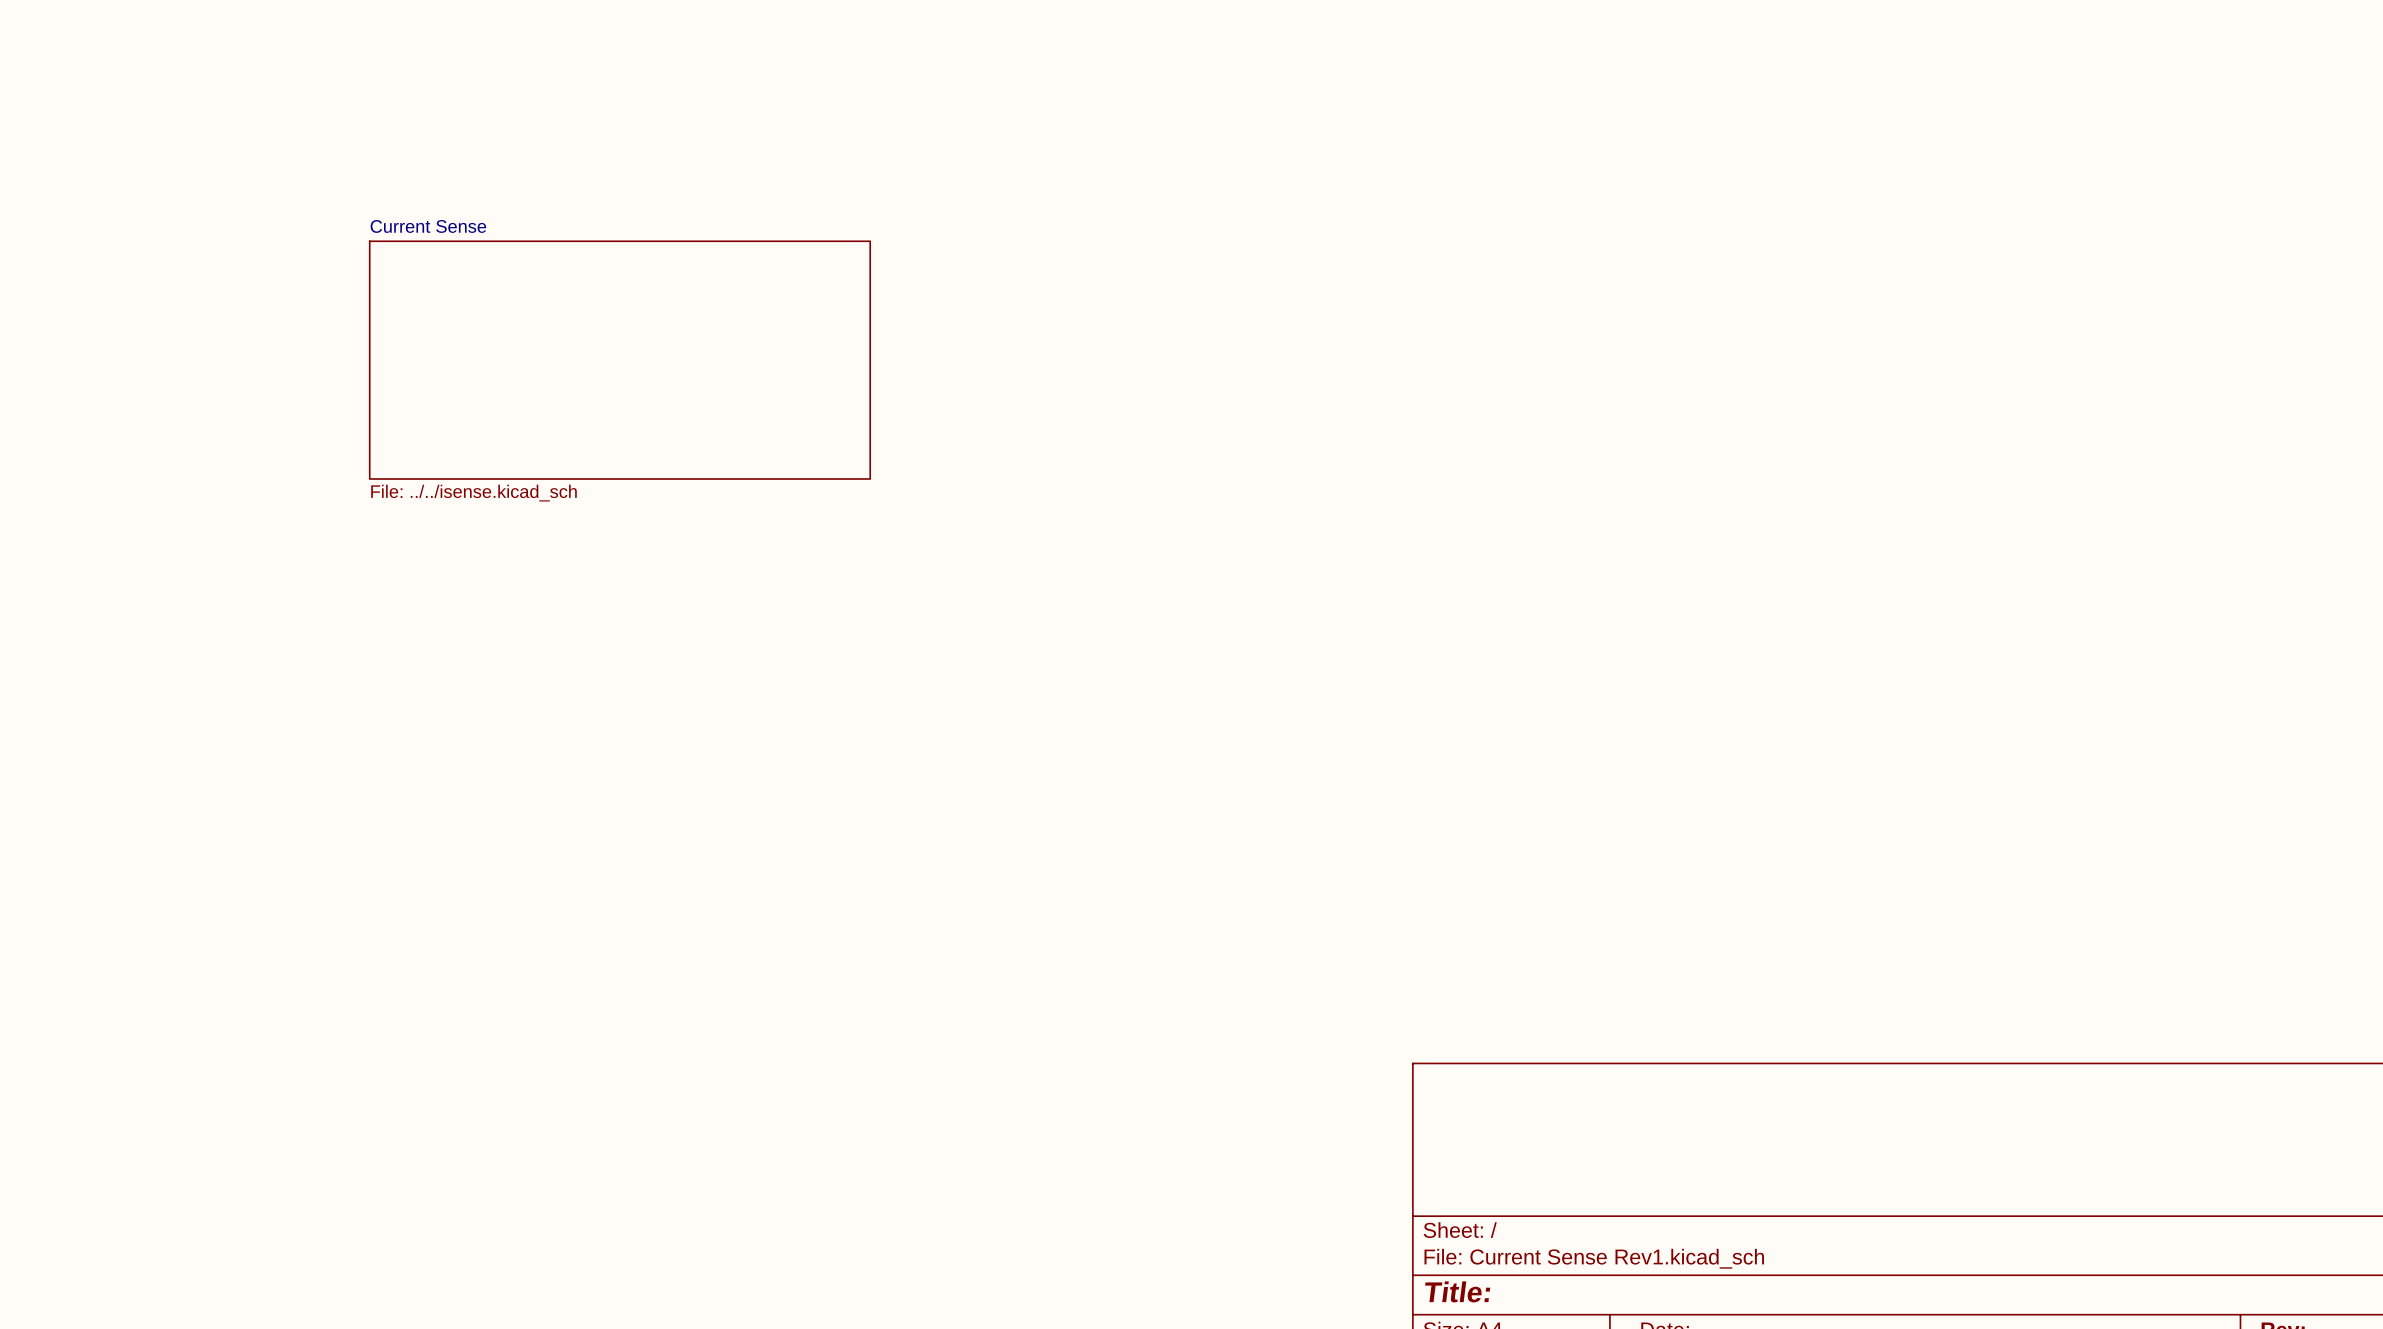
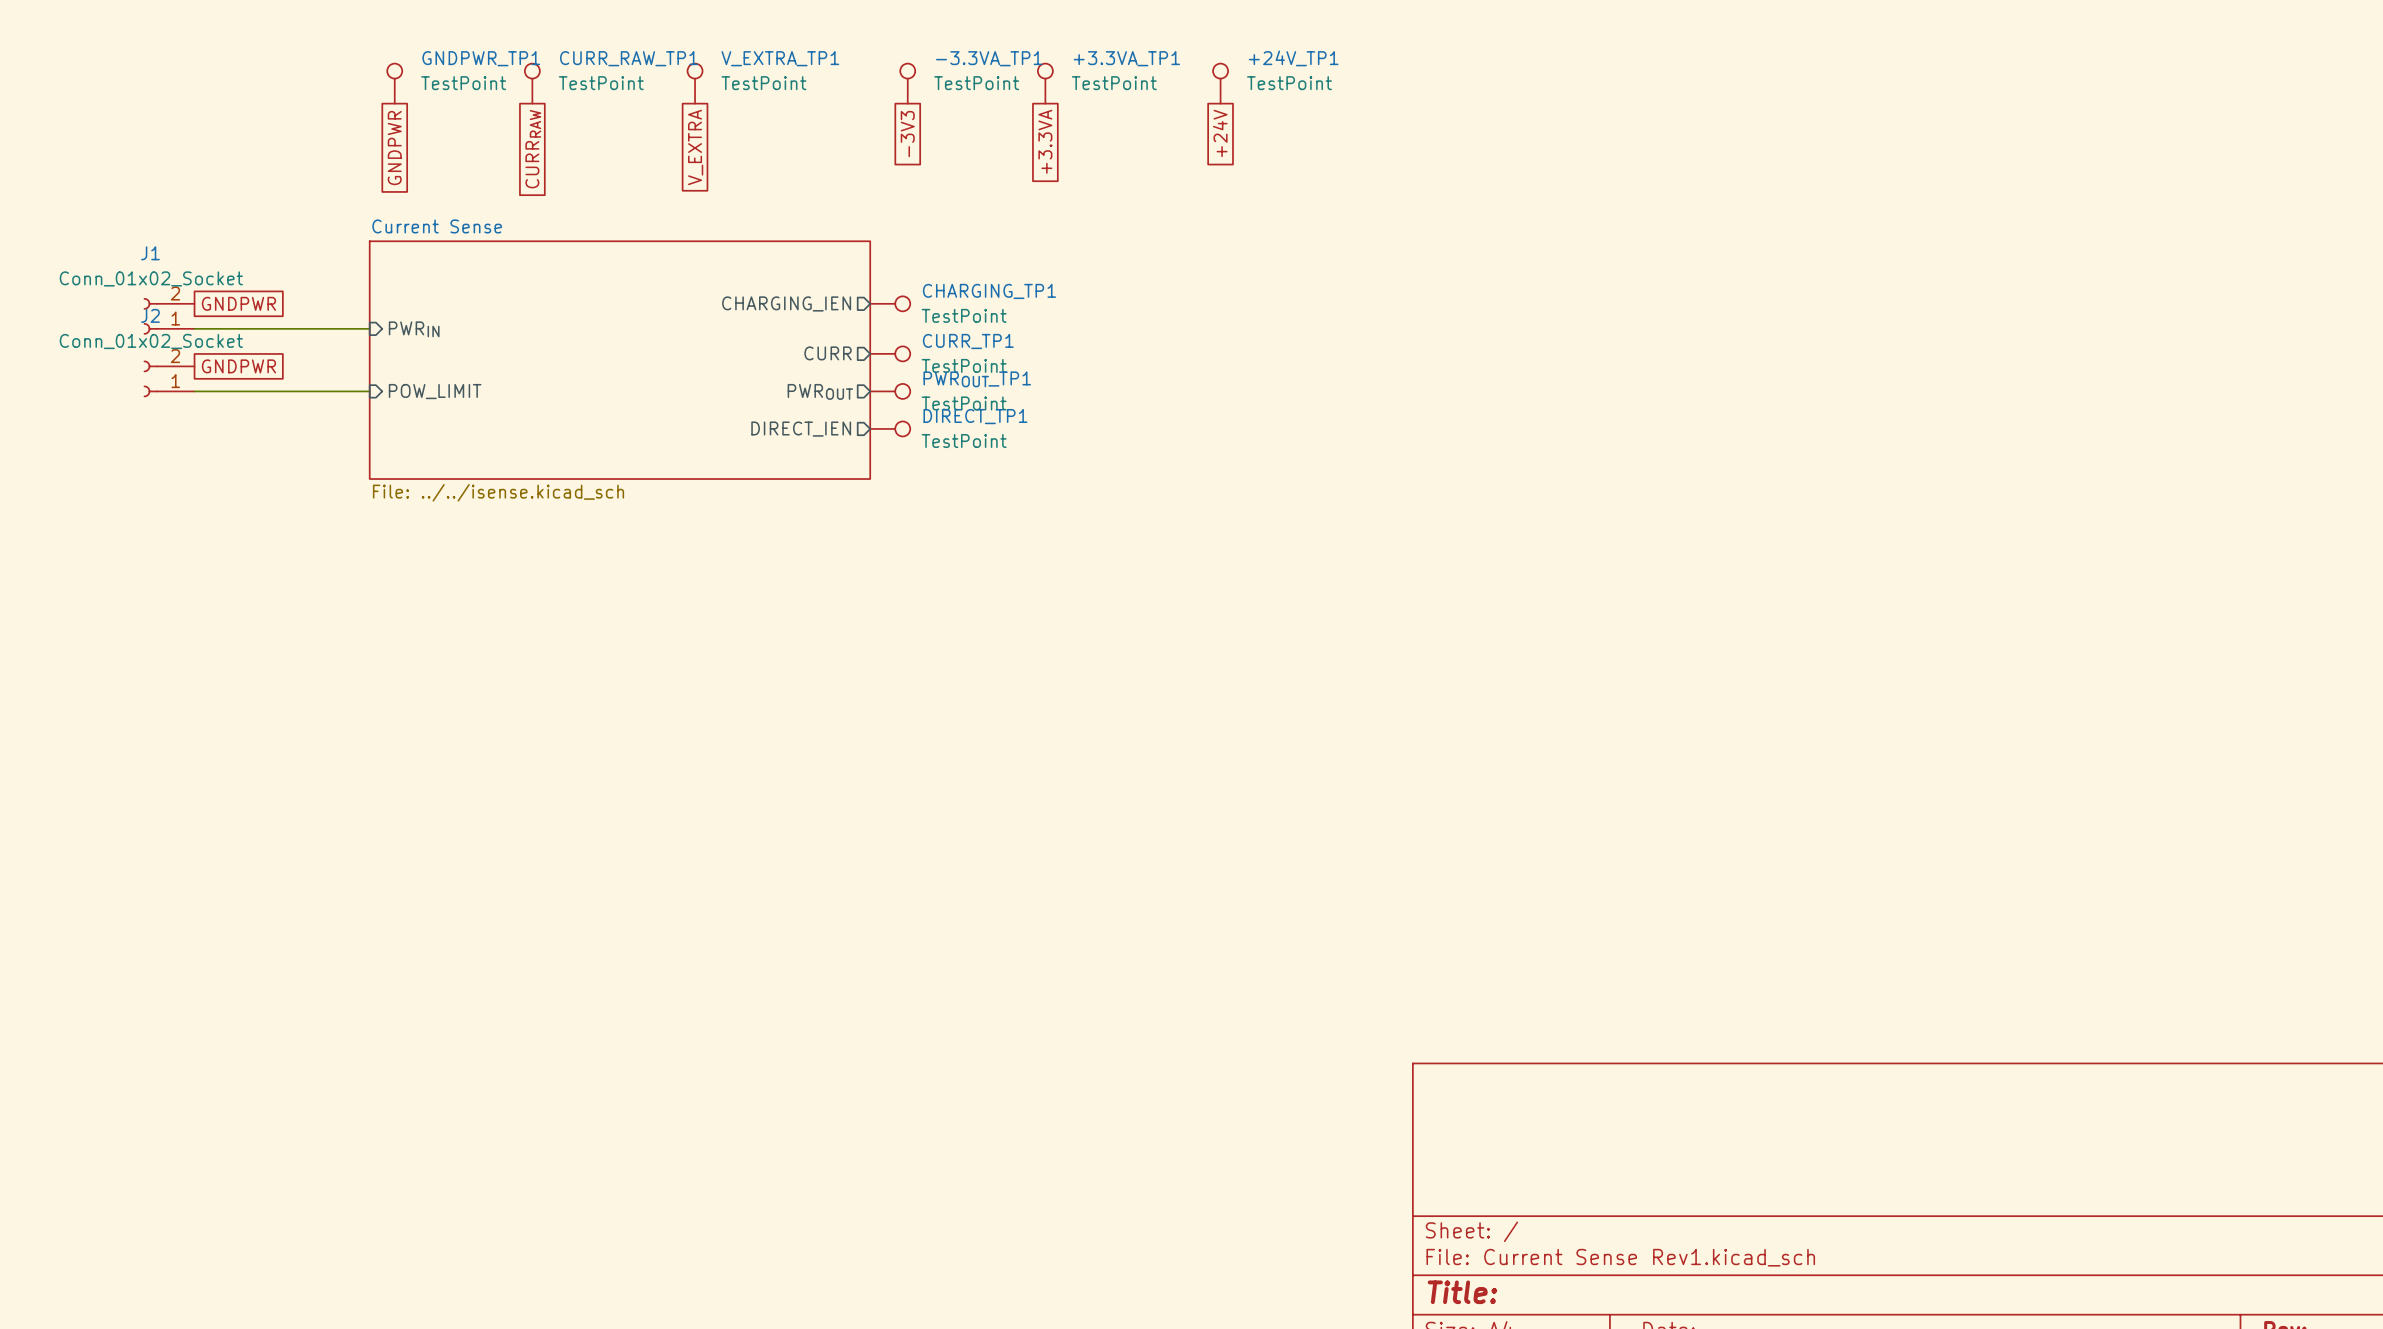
GNDPWR_TP1: none -> TestPoint (394, 83)
CURR_RAW_TP1: none -> TestPoint (532, 83)
V_EXTRA_TP1: none -> TestPoint (695, 83)
-3.3VA_TP1: none -> TestPoint (907, 83)
+3.3VA_TP1: none -> TestPoint (1045, 83)
+24V_TP1: none -> TestPoint (1220, 83)
global label: none -> -3V3 (907, 134)
global label: none -> +24V (1220, 133)
global label: none -> +3.3VA (1045, 141)
global label: none -> GNDPWR (394, 148)
global label: none -> V_EXTRA (695, 147)
global label: none -> CURRRAW (533, 149)
global label: none -> GNDPWR (238, 303)
CHARGING_TP1: none -> TestPoint (890, 303)
sheet pin: none -> CHARGING_IEN (786, 303)
J1: none -> Conn_01x02_Socket (169, 316)
wire: none -> (194, 328) (369, 328)
sheet pin: none -> PWRIN (414, 329)
sheet pin: none -> CURR (828, 353)
CURR_TP1: none -> TestPoint (890, 353)
global label: none -> GNDPWR (238, 366)
J2: none -> Conn_01x02_Socket (169, 378)
wire: none -> (194, 391) (369, 391)
sheet pin: none -> PWROUT (820, 391)
PWROUT_TP1: none -> TestPoint (890, 391)
sheet pin: none -> POW_LIMIT (435, 391)
DIRECT_TP1: none -> TestPoint (890, 428)
sheet pin: none -> DIRECT_IEN (801, 429)

